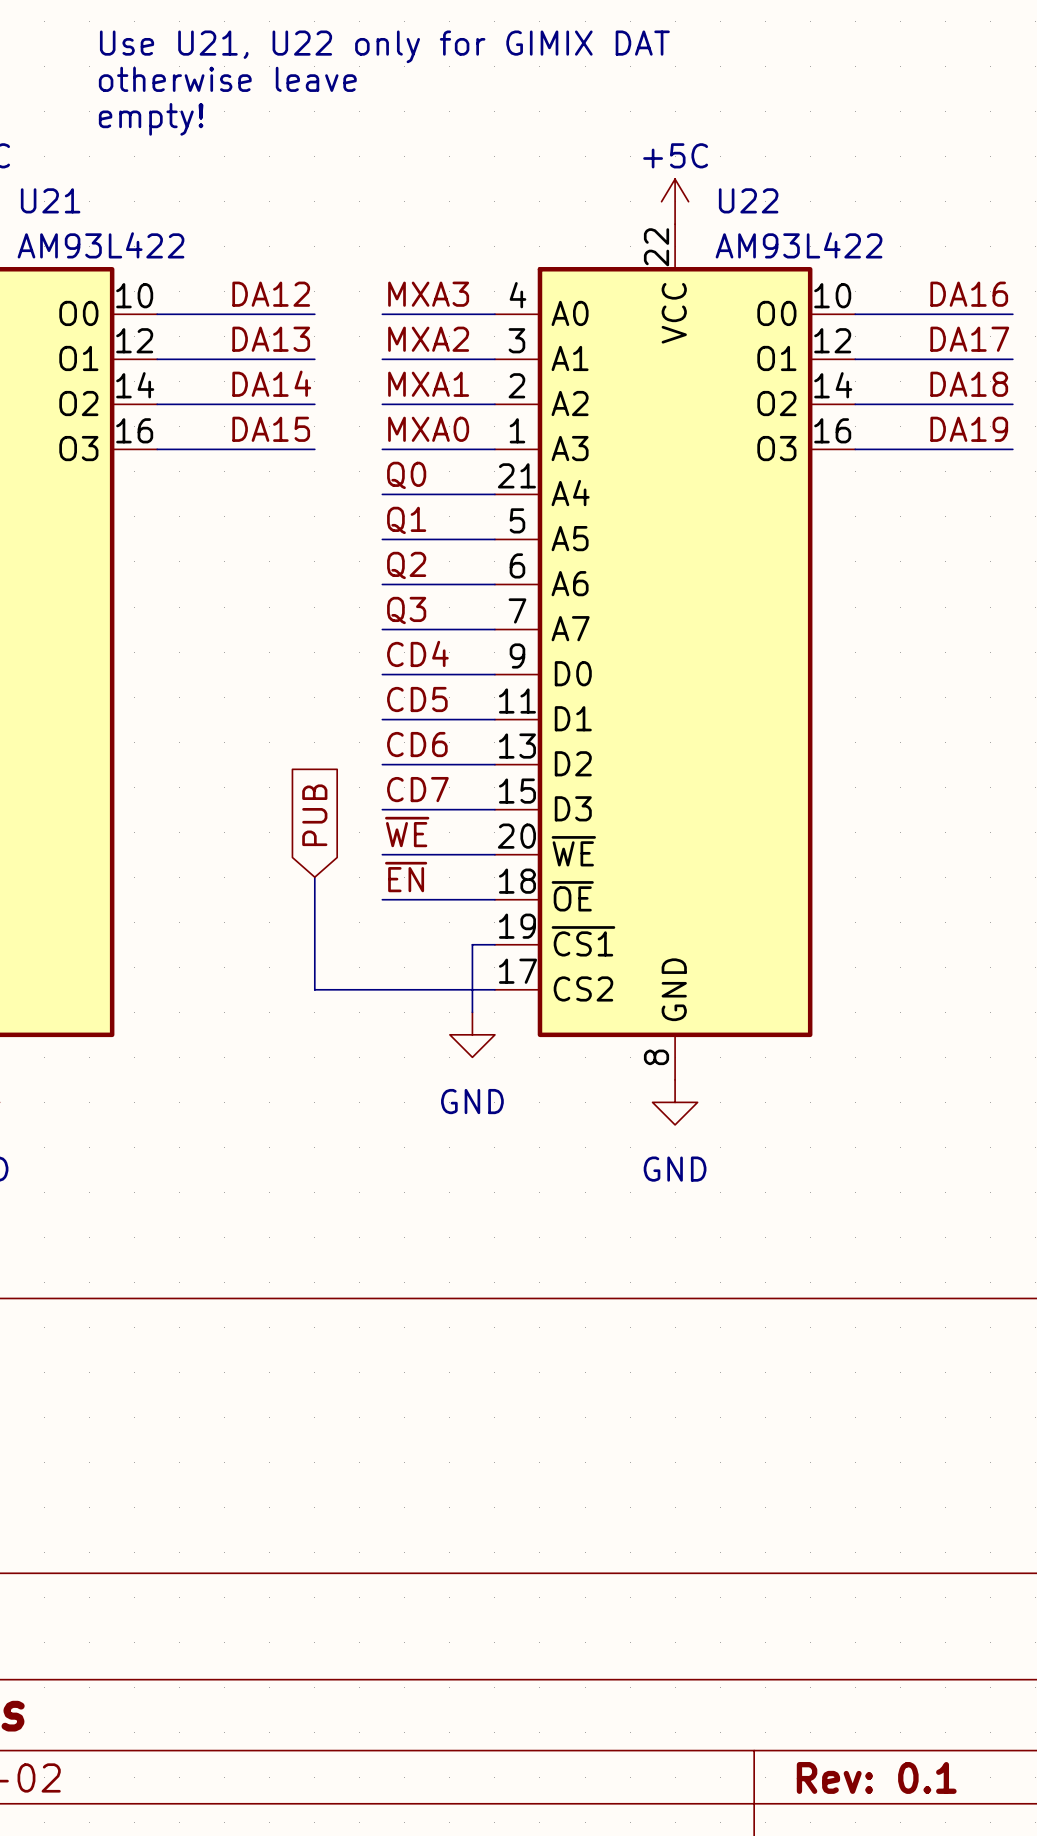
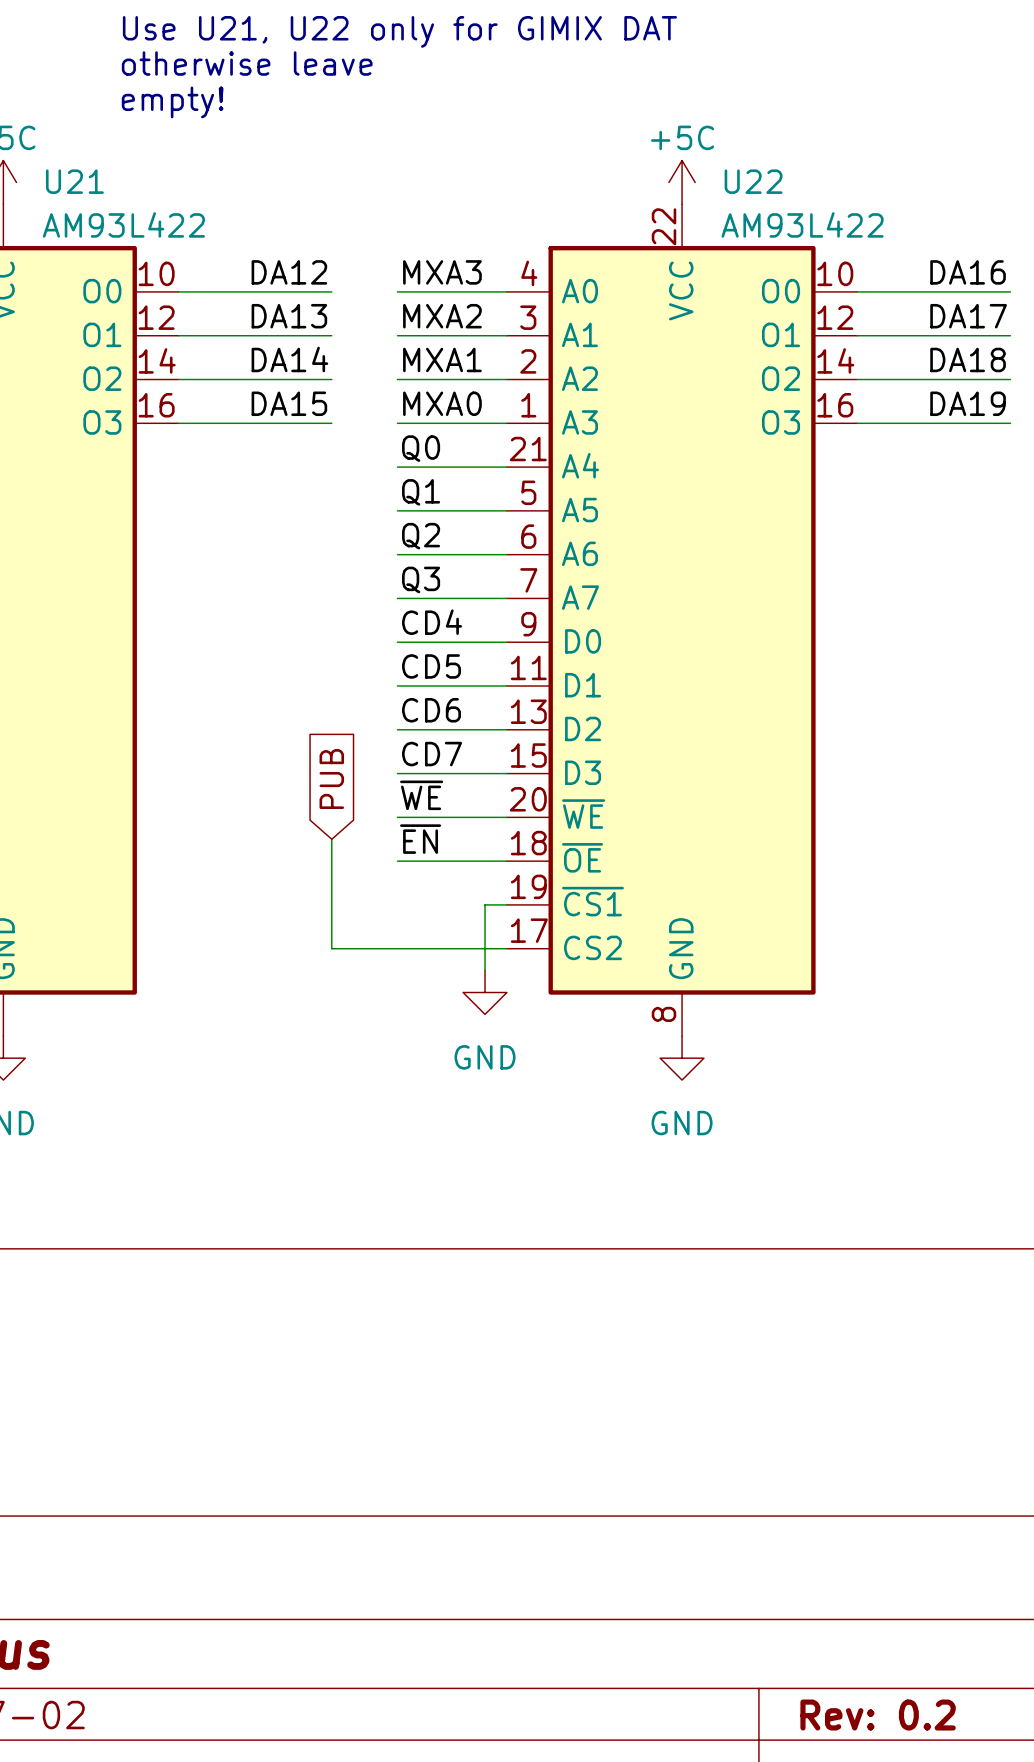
title block: Rev: 0.1 (876, 1777) -> Rev: 0.2 (878, 1715)

